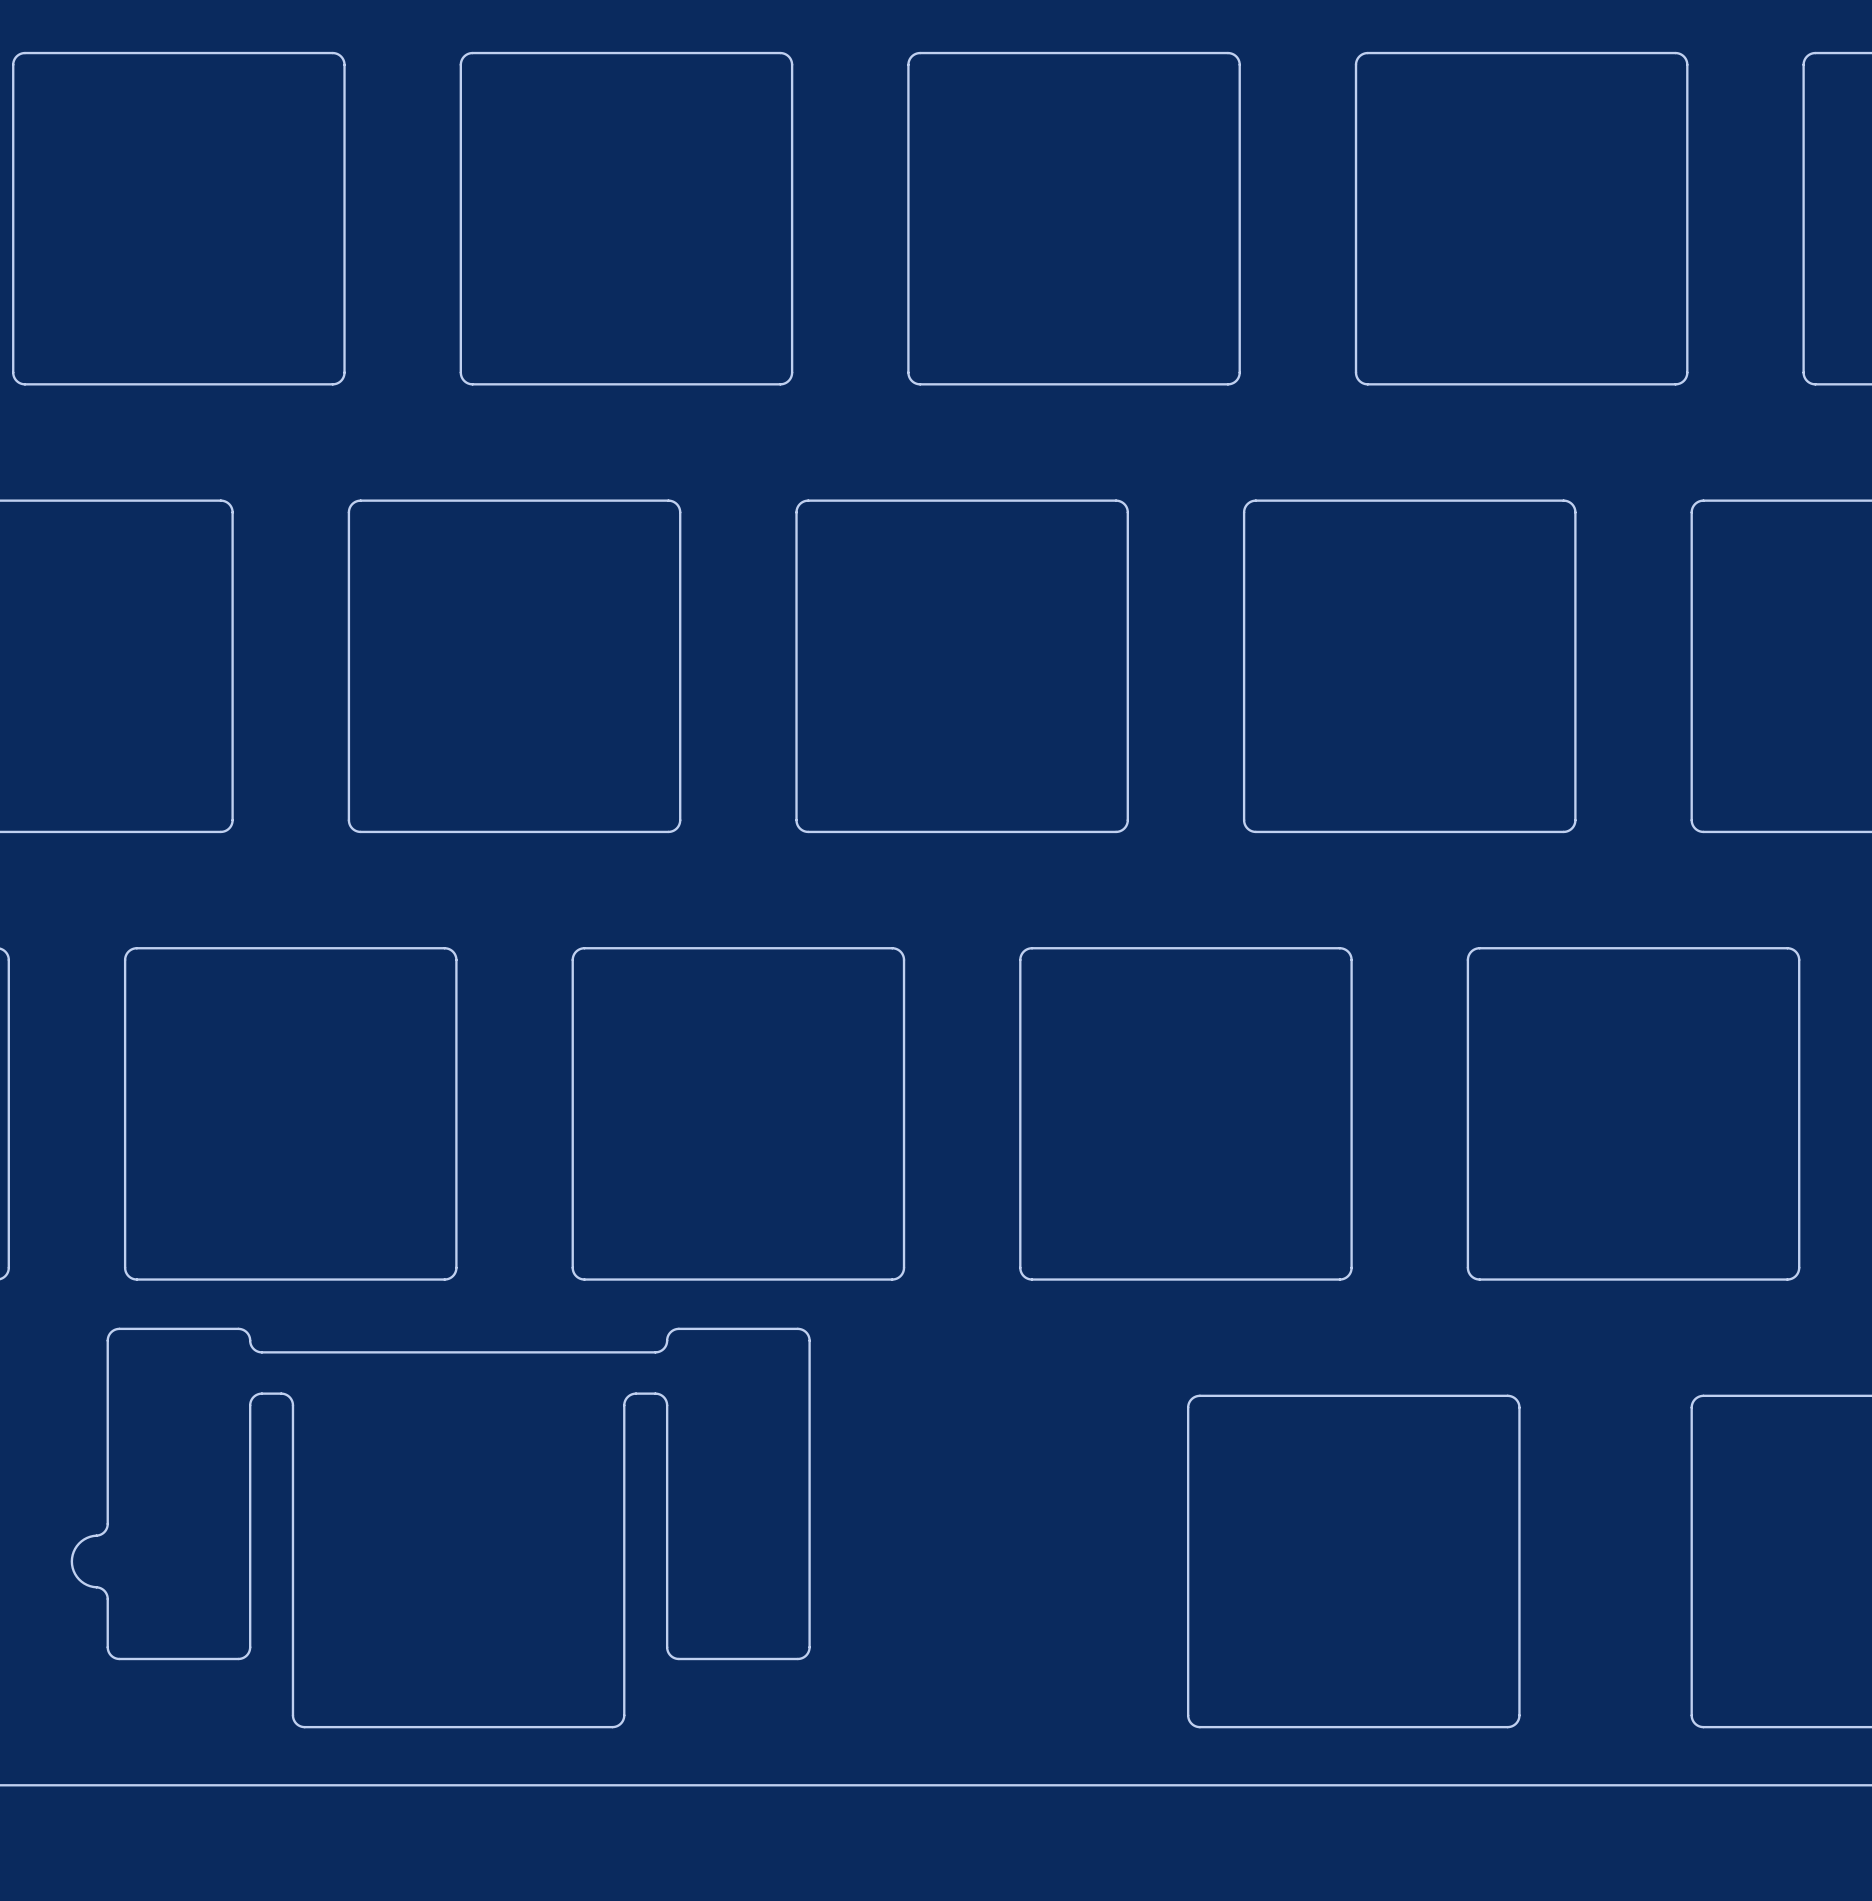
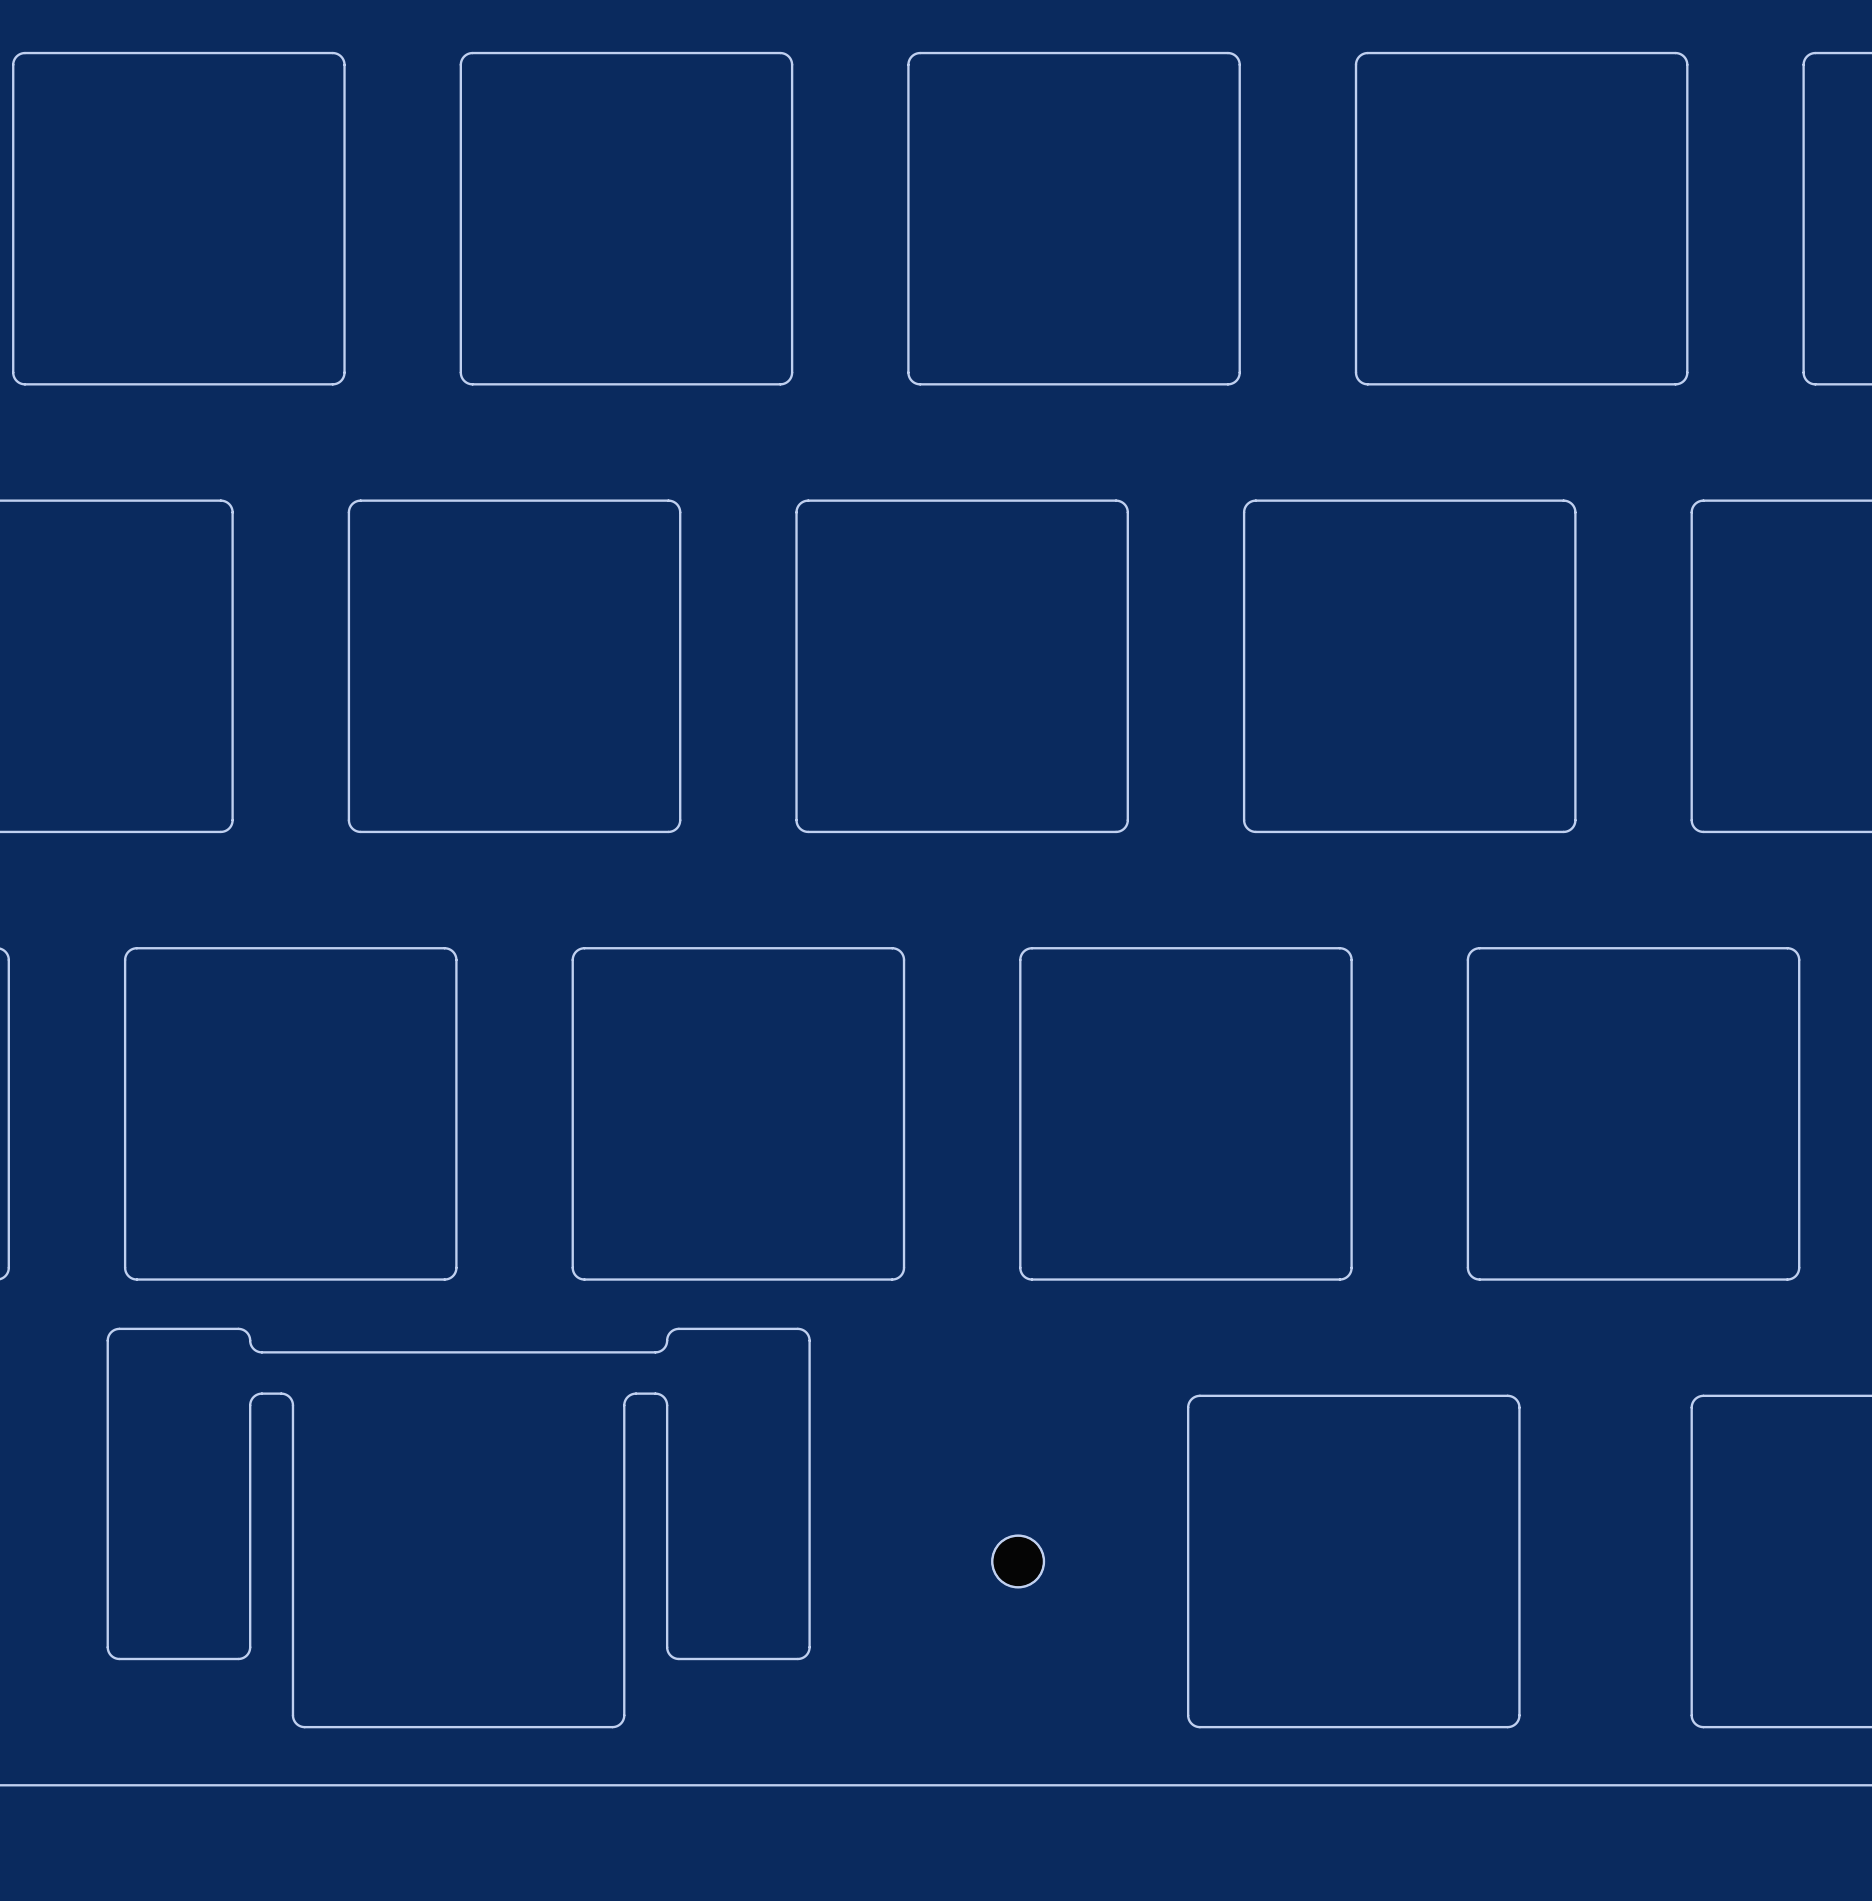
board edge: (107, 1523) (102, 1533) (87, 1537) (79, 1543) (73, 1551) (71, 1561) (73, 1571) (79, 1579) (87, 1585) (102, 1589) (107, 1599) -> (107, 1523) (107, 1599)
round board edge: none -> [991, 1534, 1046, 1589]
part: none -> (1018, 1561)

